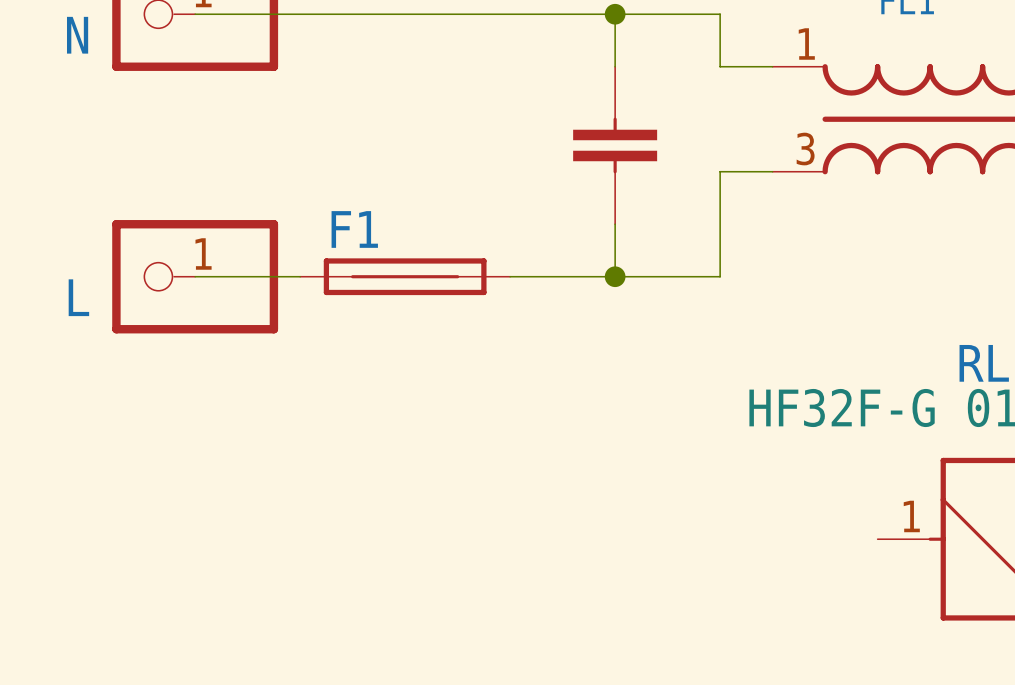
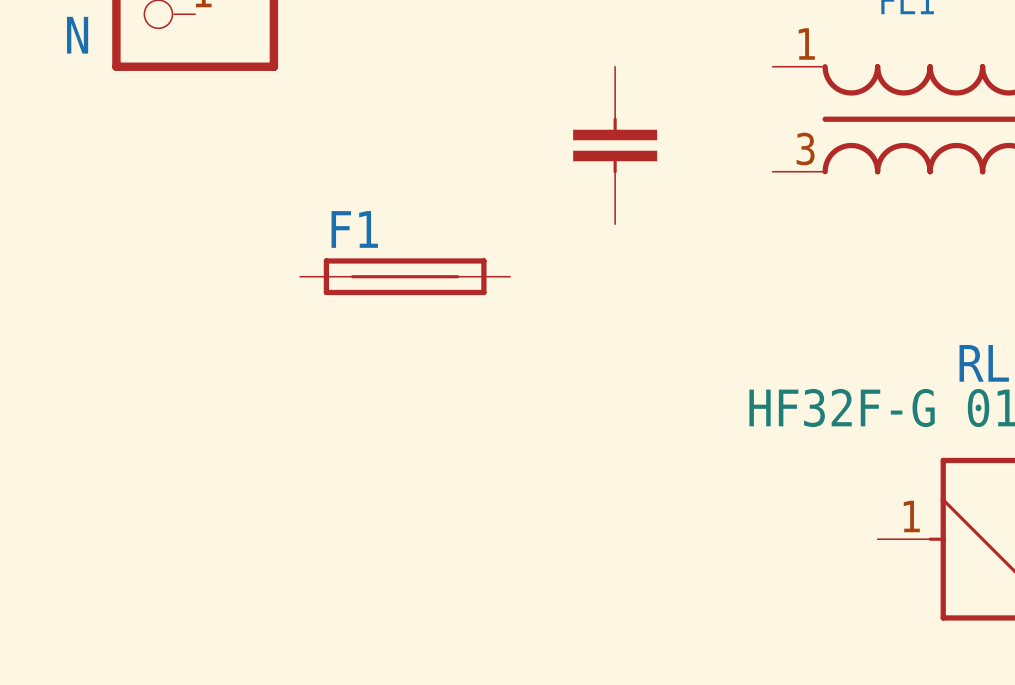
wire: (195, 14) (720, 14) (720, 66) (772, 66) -> none
wire: (615, 14) (615, 66) -> none
junction: (615, 14) -> none
wire: (772, 171) (720, 171) (720, 276) (510, 276) -> none
wire: (615, 224) (615, 276) -> none
wire: (195, 276) (300, 276) -> none
L: (195, 276) -> none
junction: (615, 276) -> none

